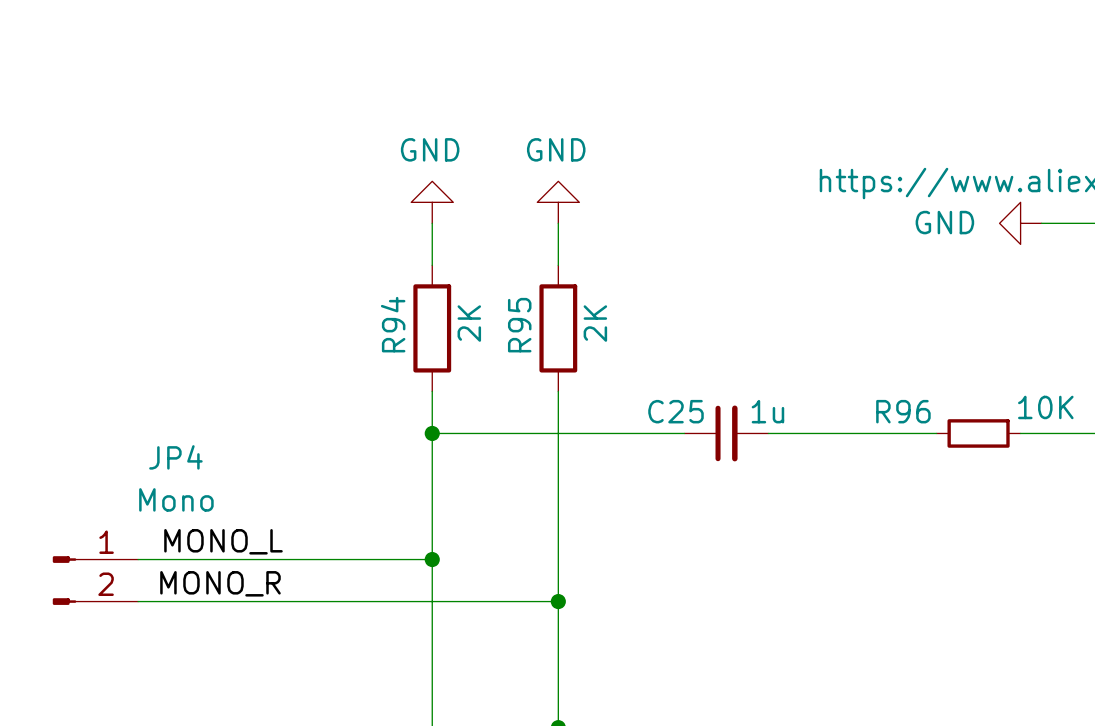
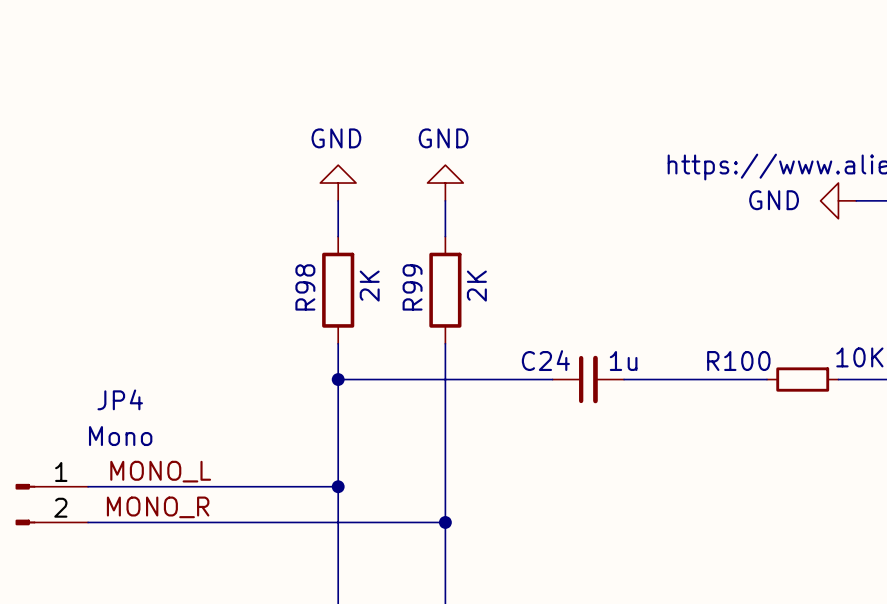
R94 name: R94 (393, 324) -> R98 (305, 287)
R95 name: R95 (519, 325) -> R99 (412, 287)
C25 name: C25 (676, 411) -> C24 (545, 360)
R96 name: R96 (903, 411) -> R100 (738, 361)

